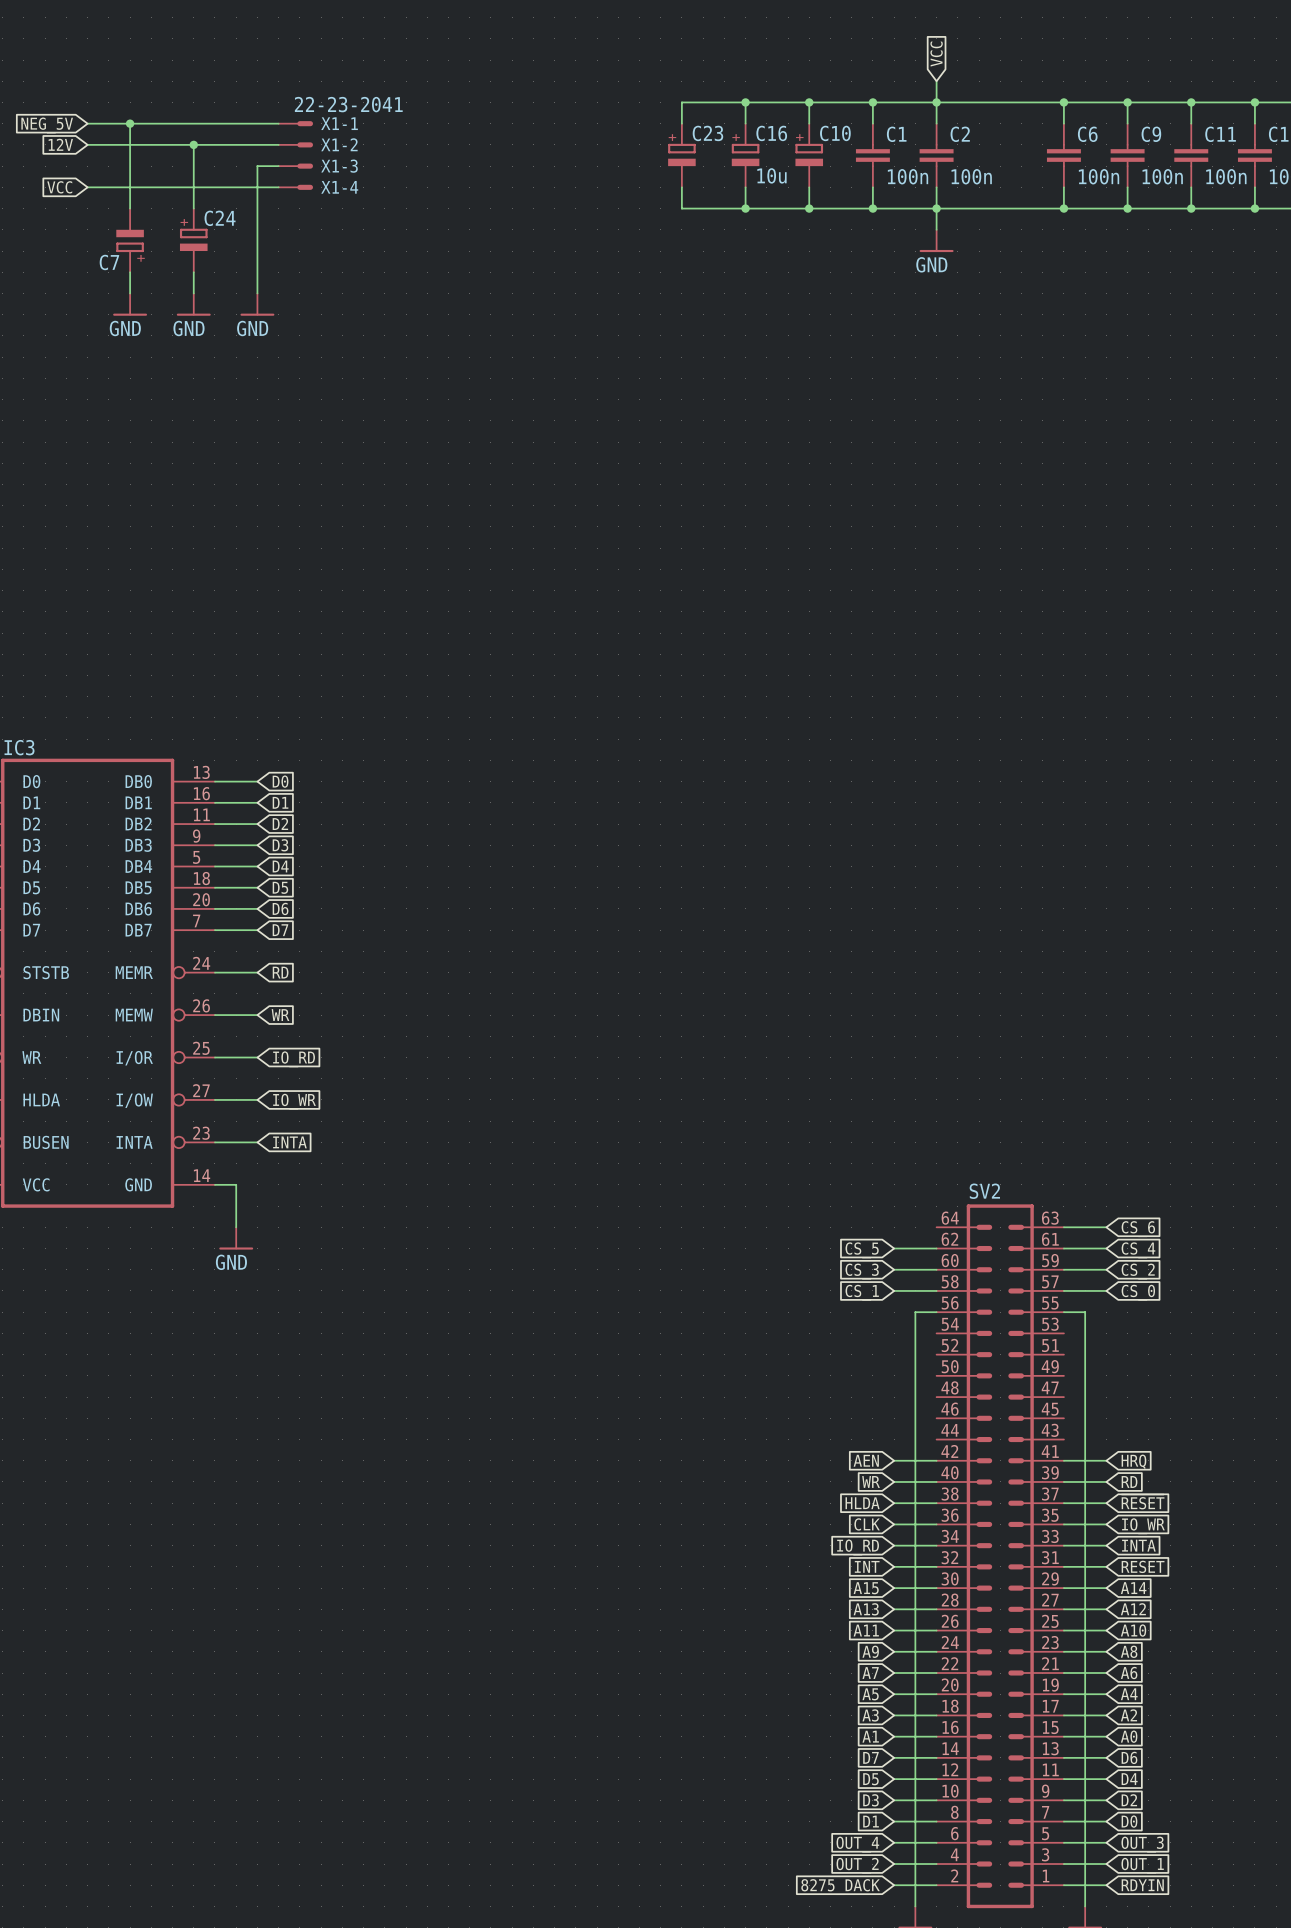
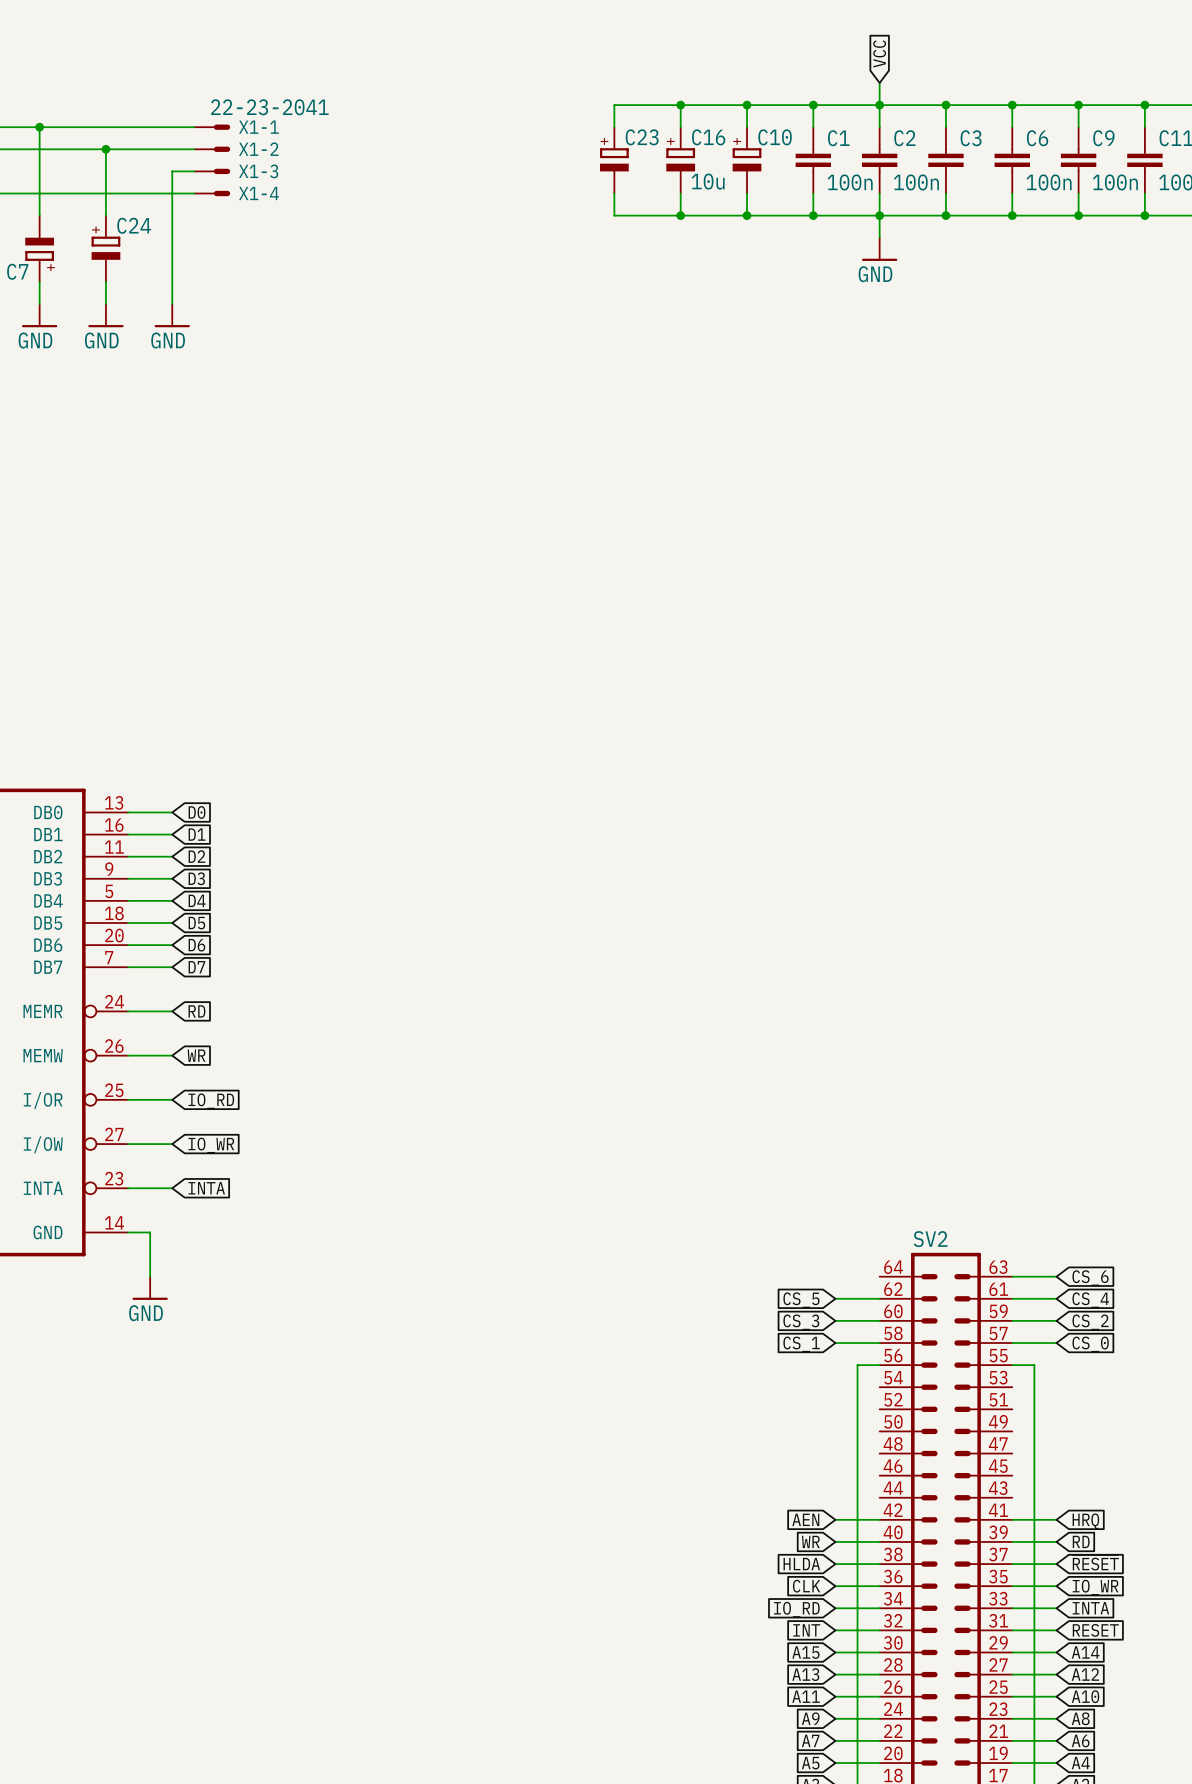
wire: none -> (945, 105) (945, 127)
junction: none -> (945, 105)
C3: none -> (945, 160)
wire: none -> (945, 193) (945, 215)
junction: none -> (945, 215)

